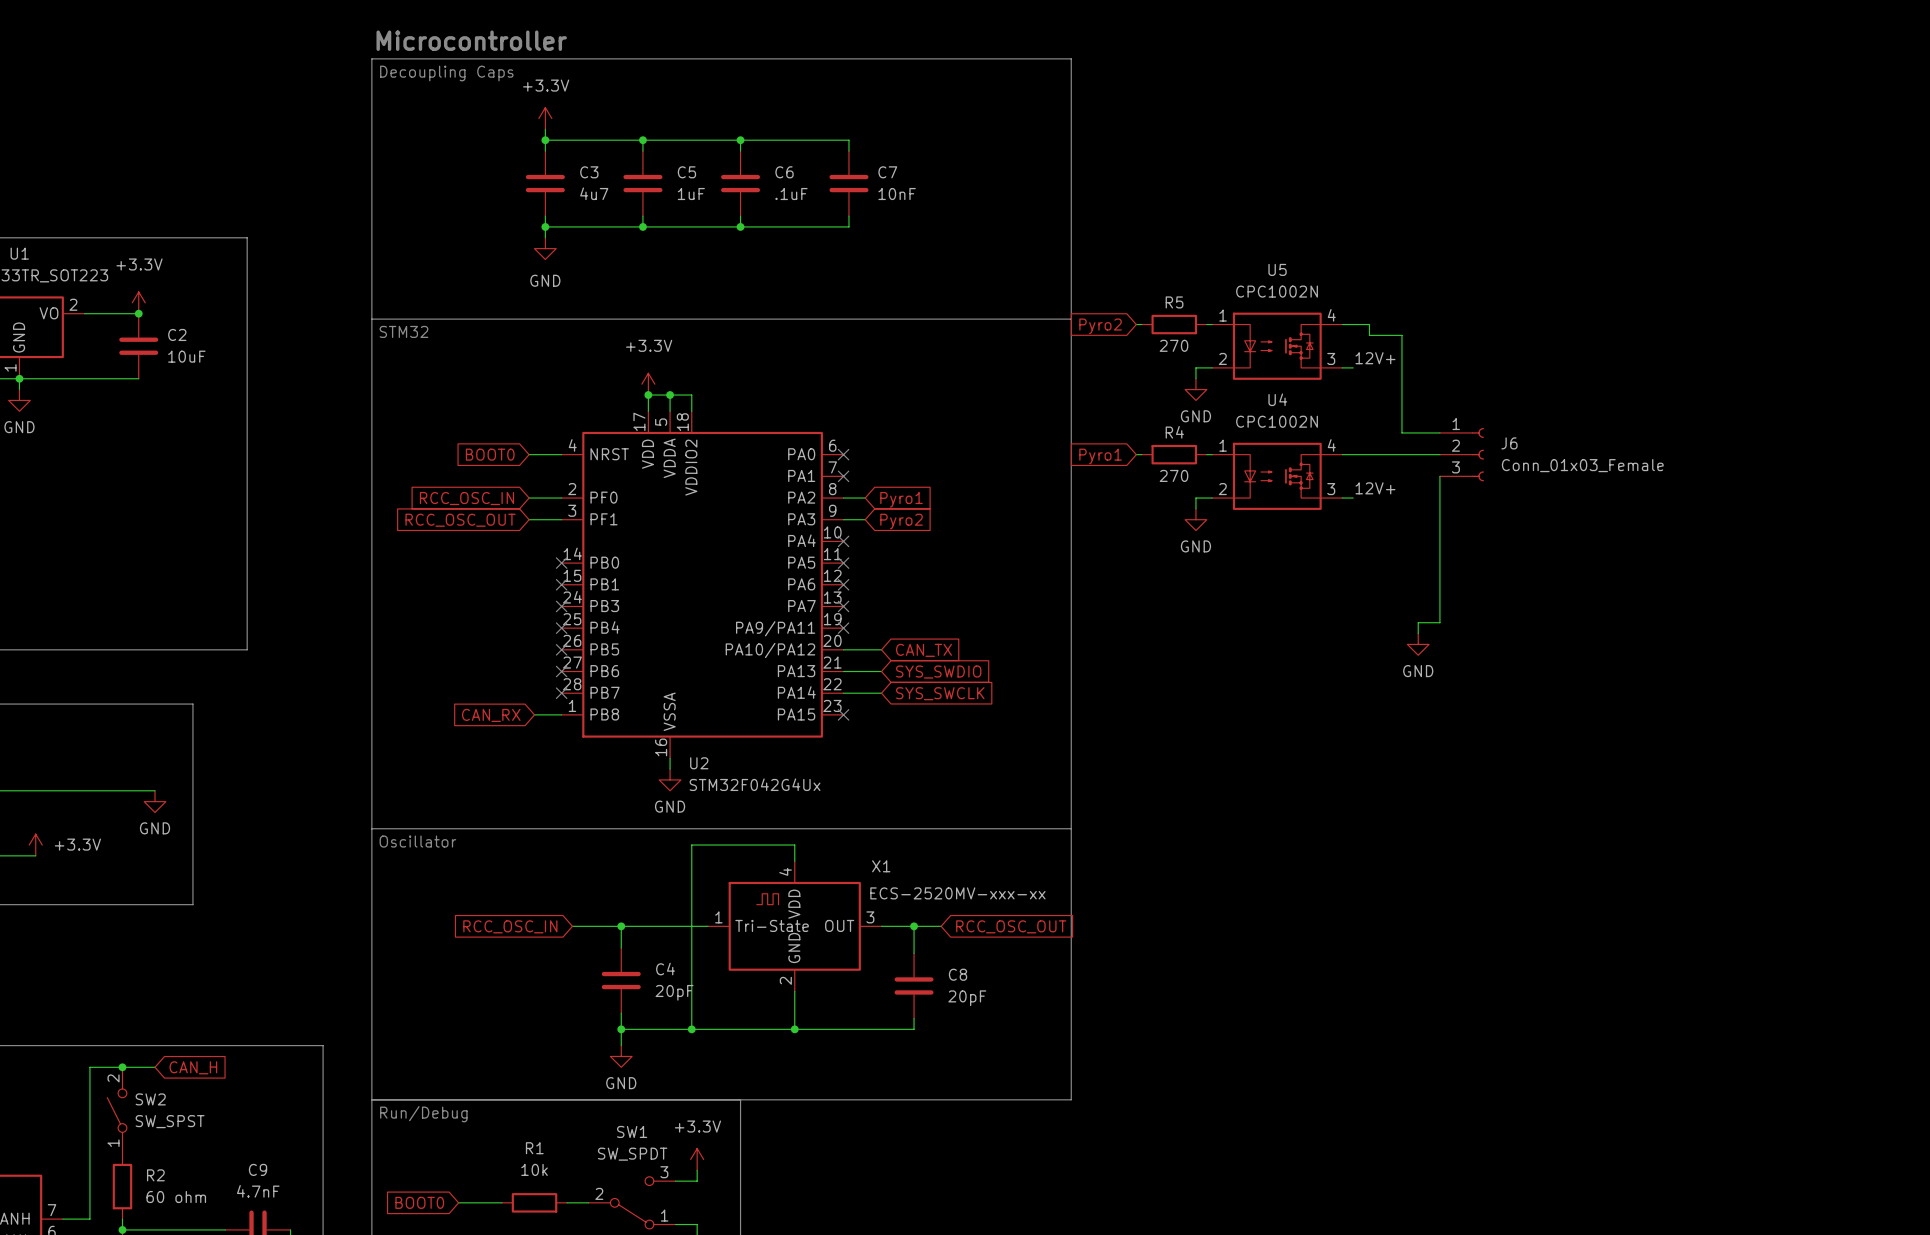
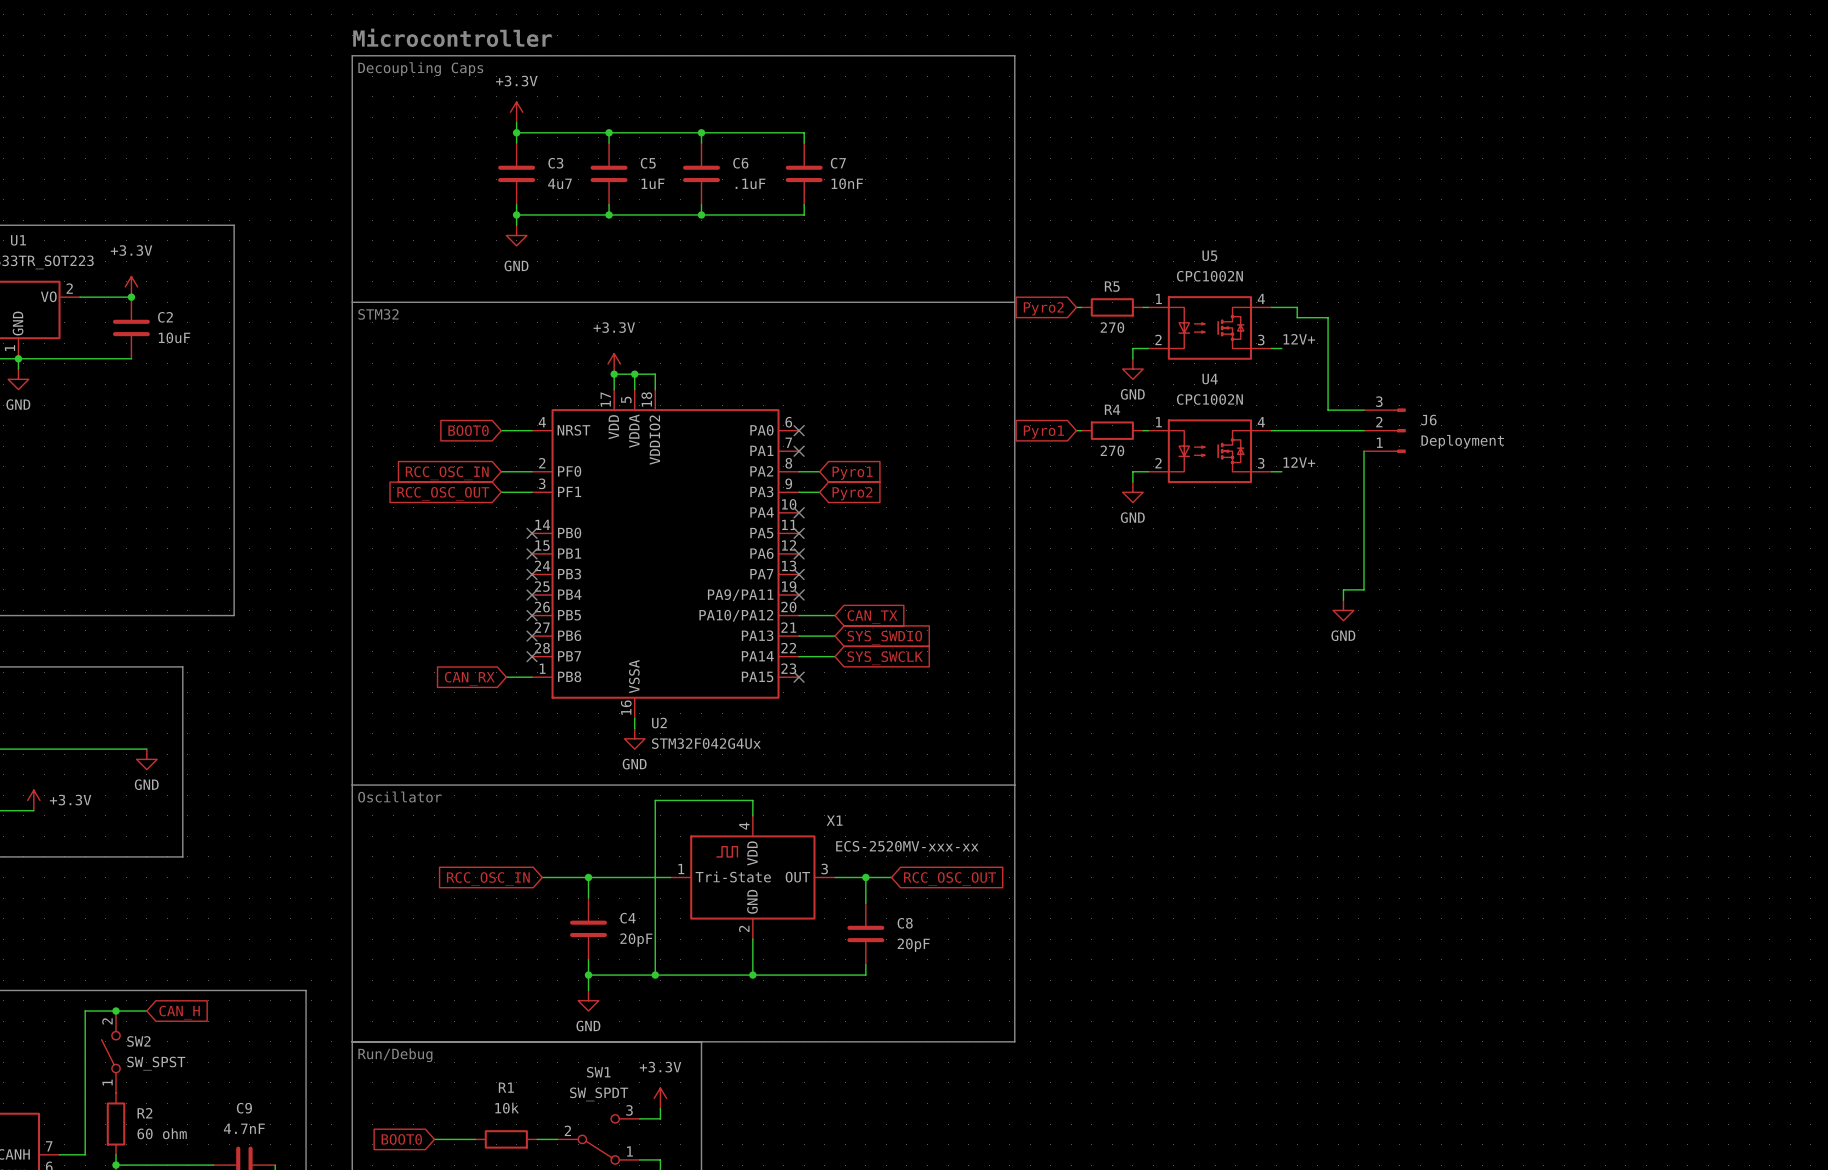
J6 symbol: [1439, 427, 1484, 482] -> [1364, 408, 1406, 453]
J6 value: Conn_01x03_Female (1582, 465) -> Deployment (1462, 441)

